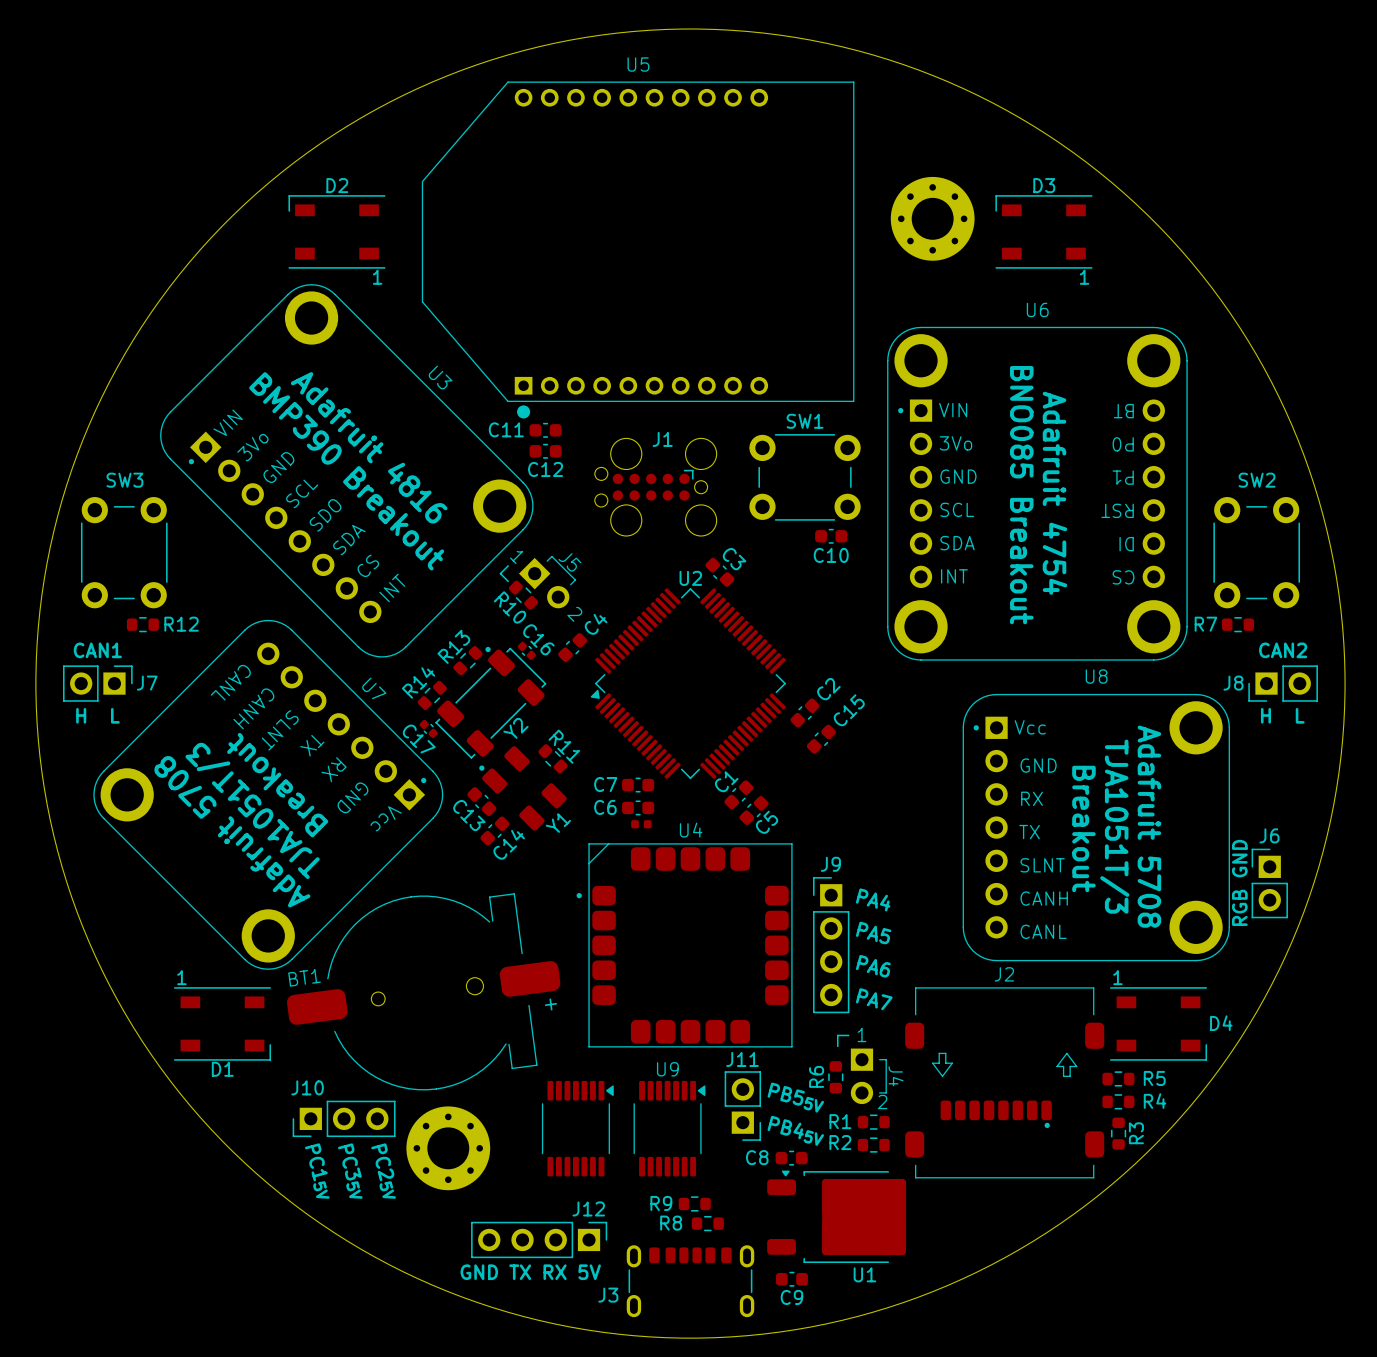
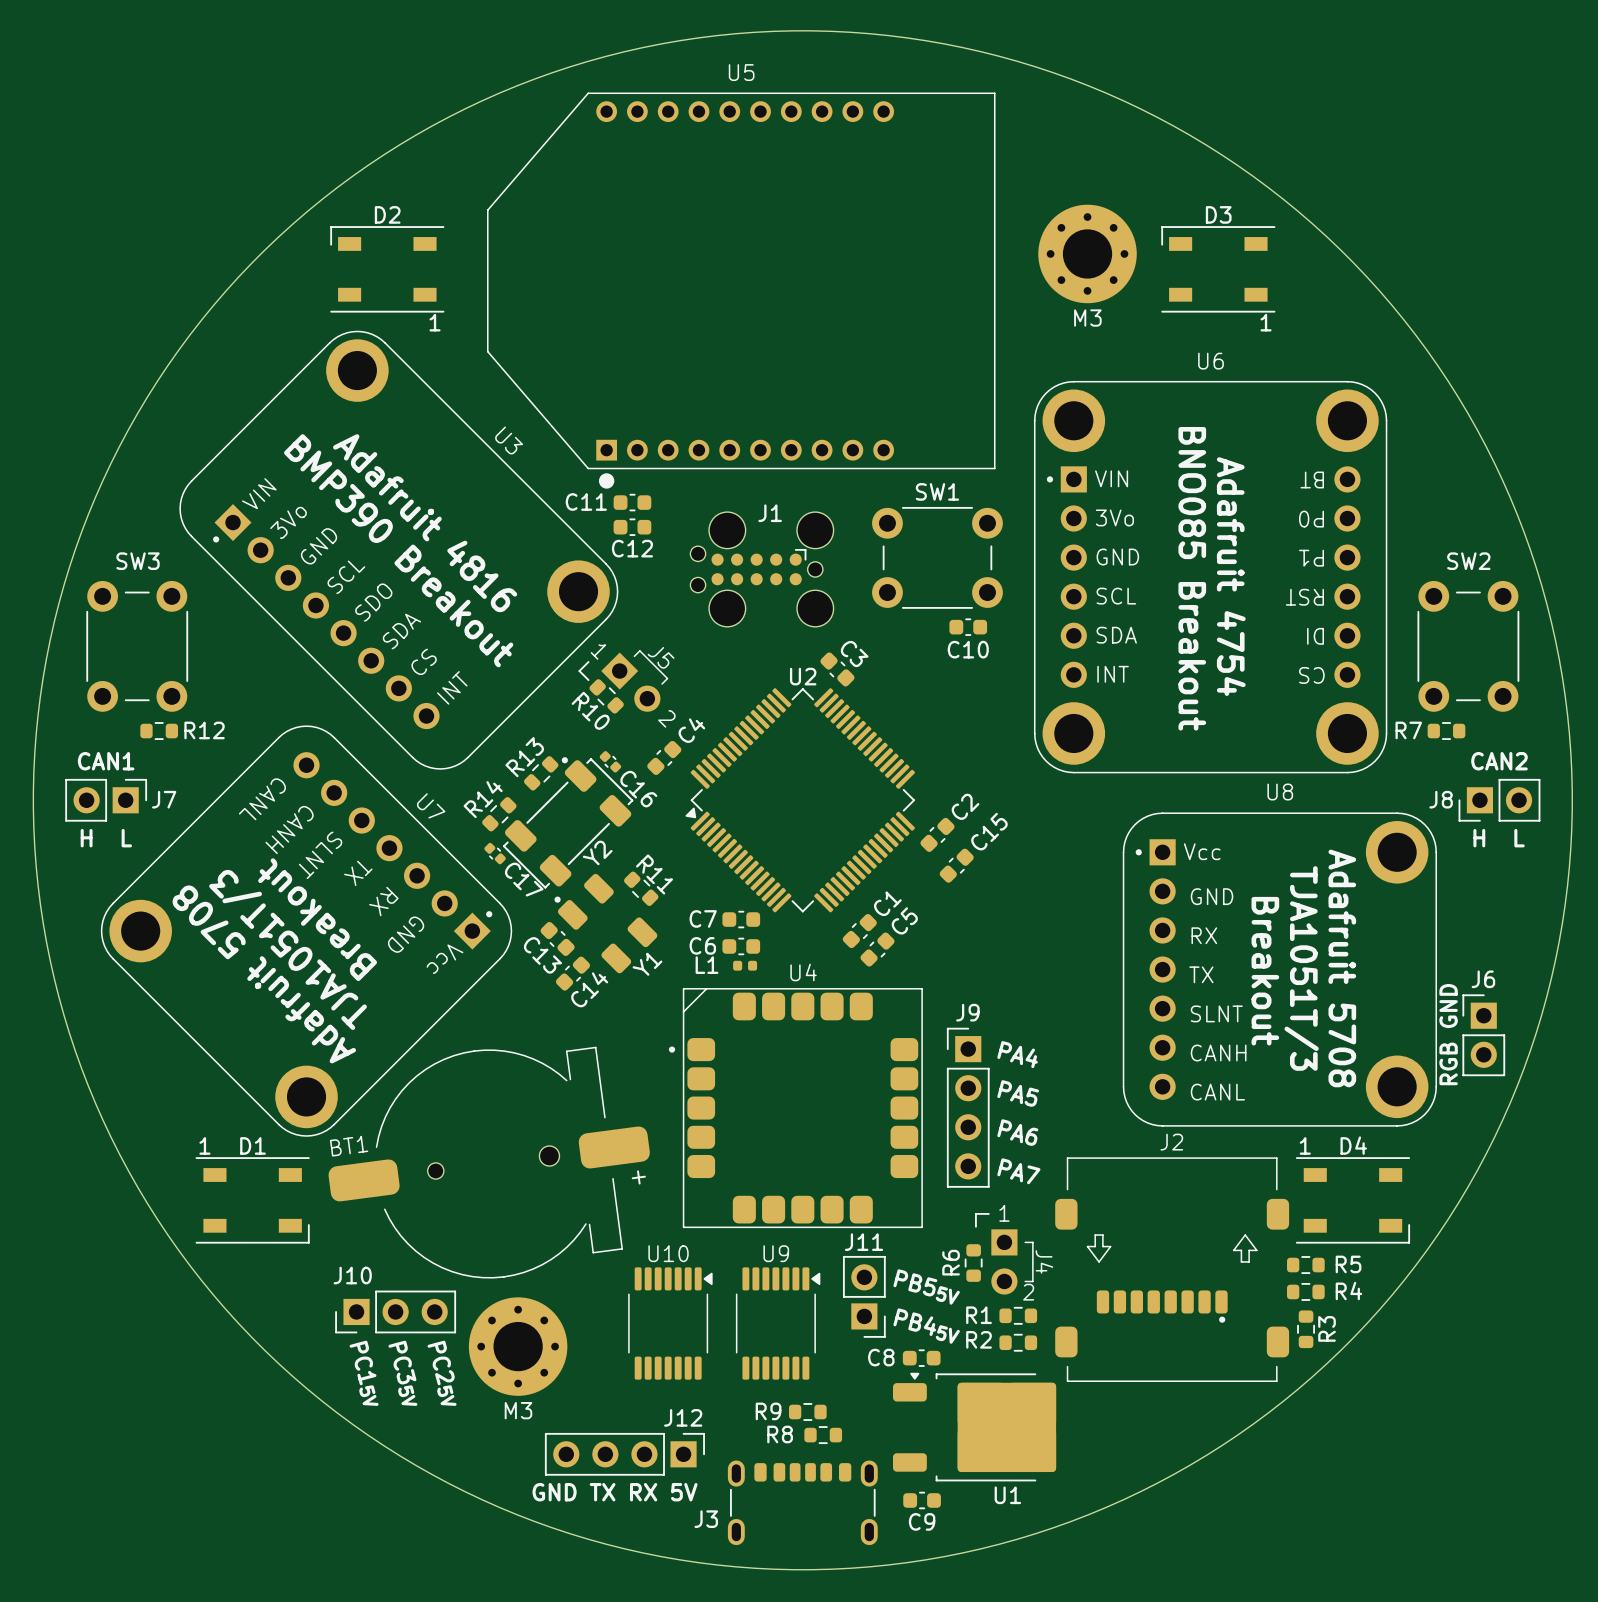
text: none -> M3 (1087, 318)
C16 name position: C16 (538, 639) -> C16 (638, 789)
C17 name position: C17 (419, 739) -> C17 (524, 879)
C1 name position: C1 (726, 781) -> C1 (887, 903)
C5 name position: C5 (767, 822) -> C5 (904, 920)
L1 name: none -> L1 (707, 965)
D4 name position: D4 (1221, 1023) -> D4 (1353, 1145)
D1 name position: D1 (222, 1069) -> D1 (253, 1145)
U10 name: none -> U10 (668, 1253)
text: none -> M3 (518, 1410)

